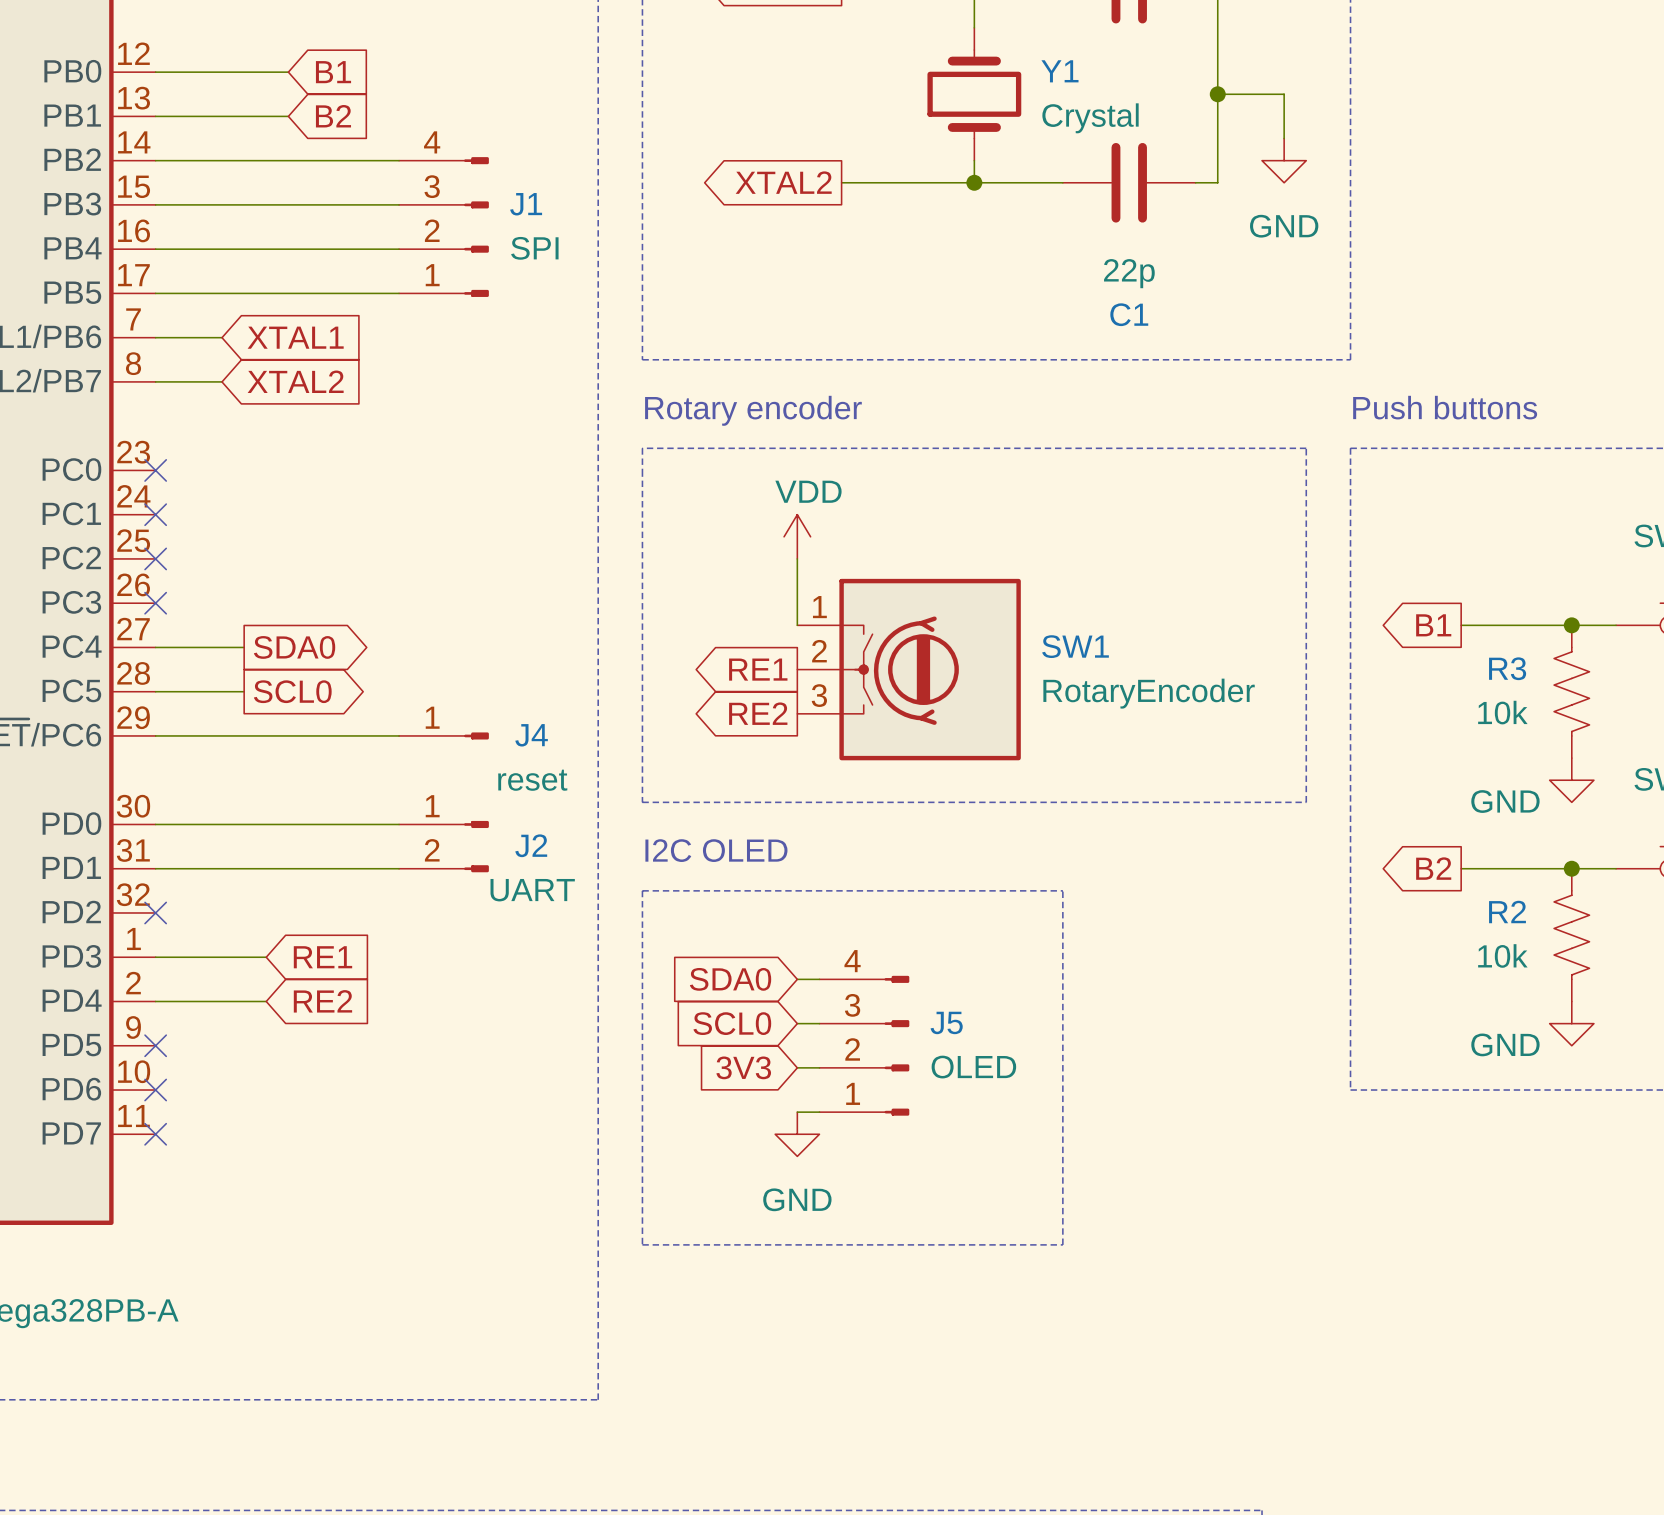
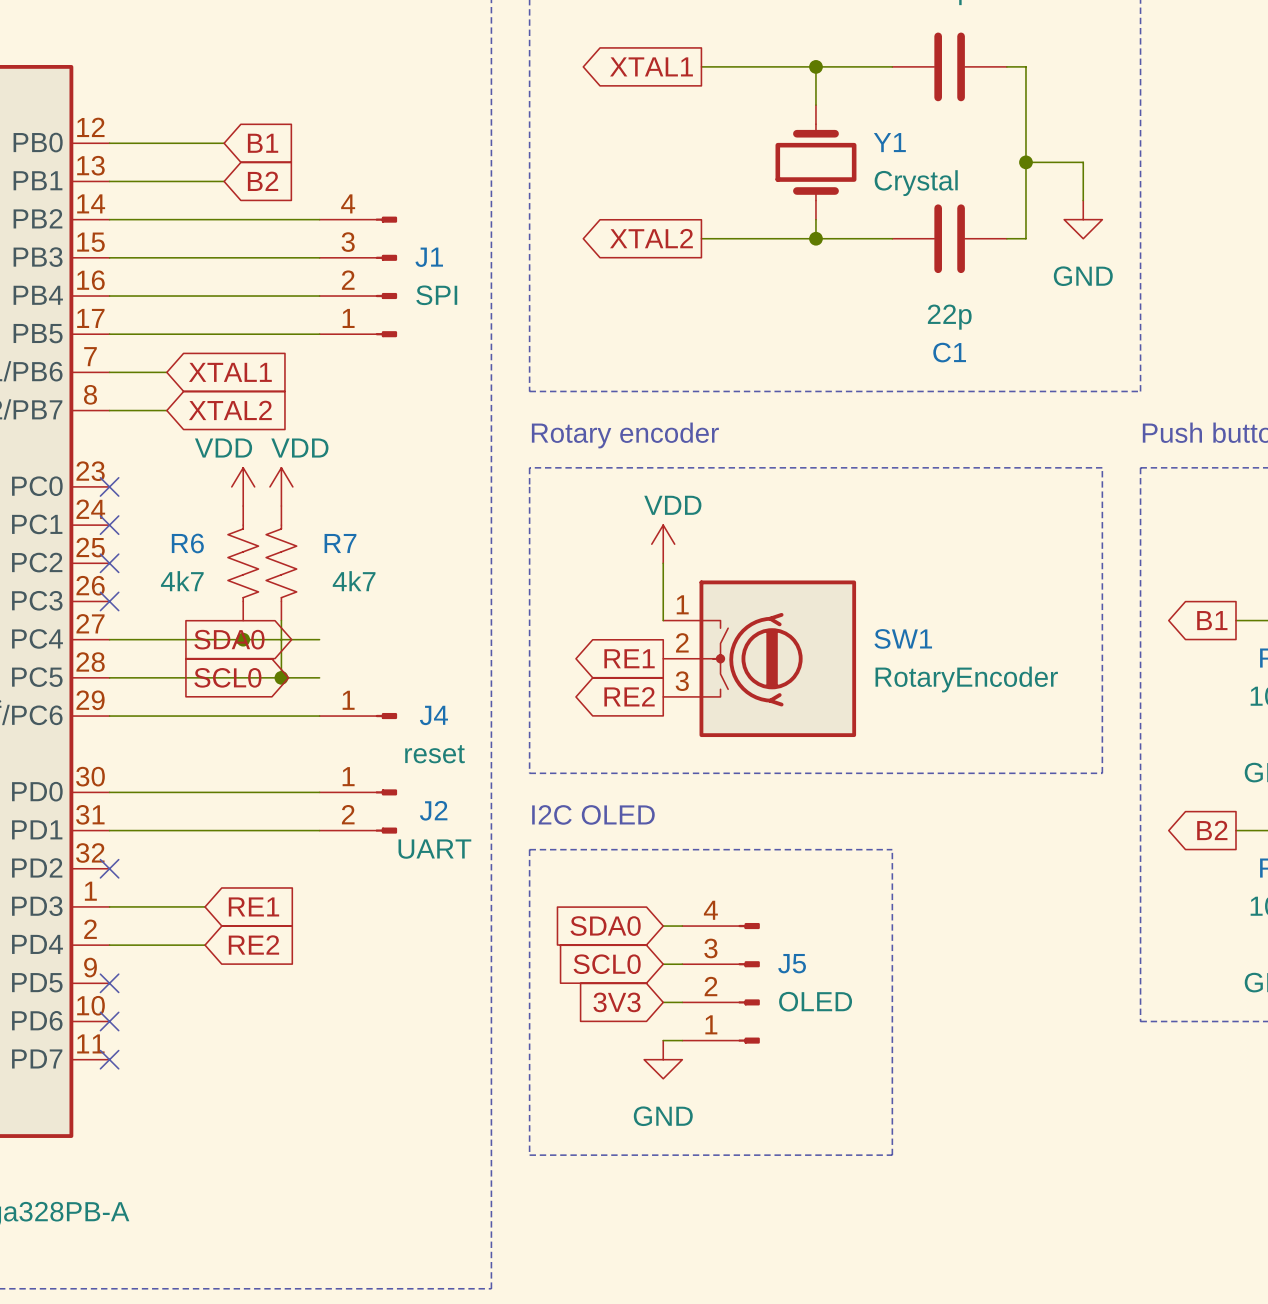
power symbol: none -> VDD (243, 486)
power symbol: none -> VDD (281, 486)
R6: none -> 4k7 (243, 563)
R7: none -> 4k7 (281, 563)
wire: none -> (281, 620) (281, 677)
wire: none -> (185, 639) (319, 639)
junction: none -> (243, 639)
wire: none -> (185, 677) (319, 677)
junction: none -> (281, 677)

